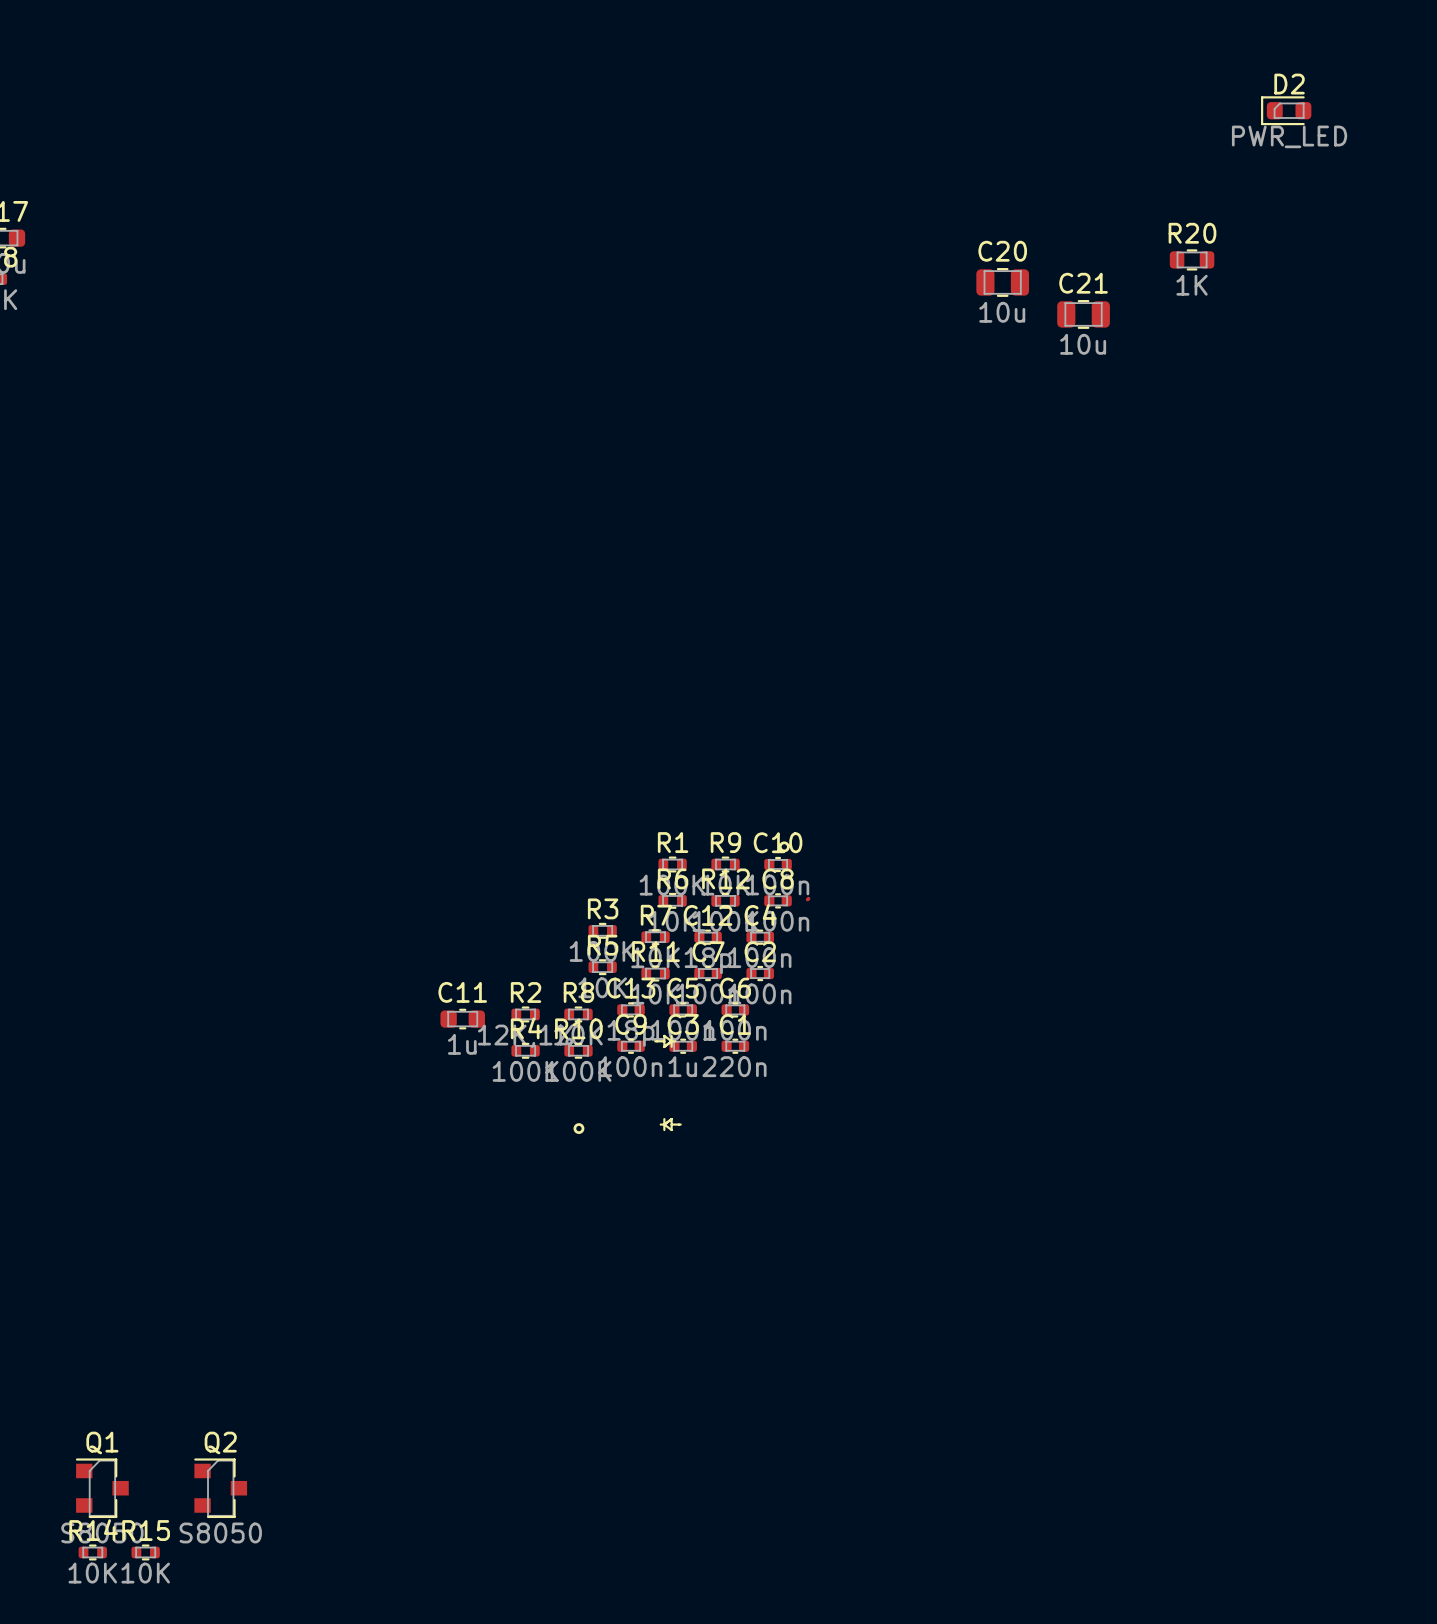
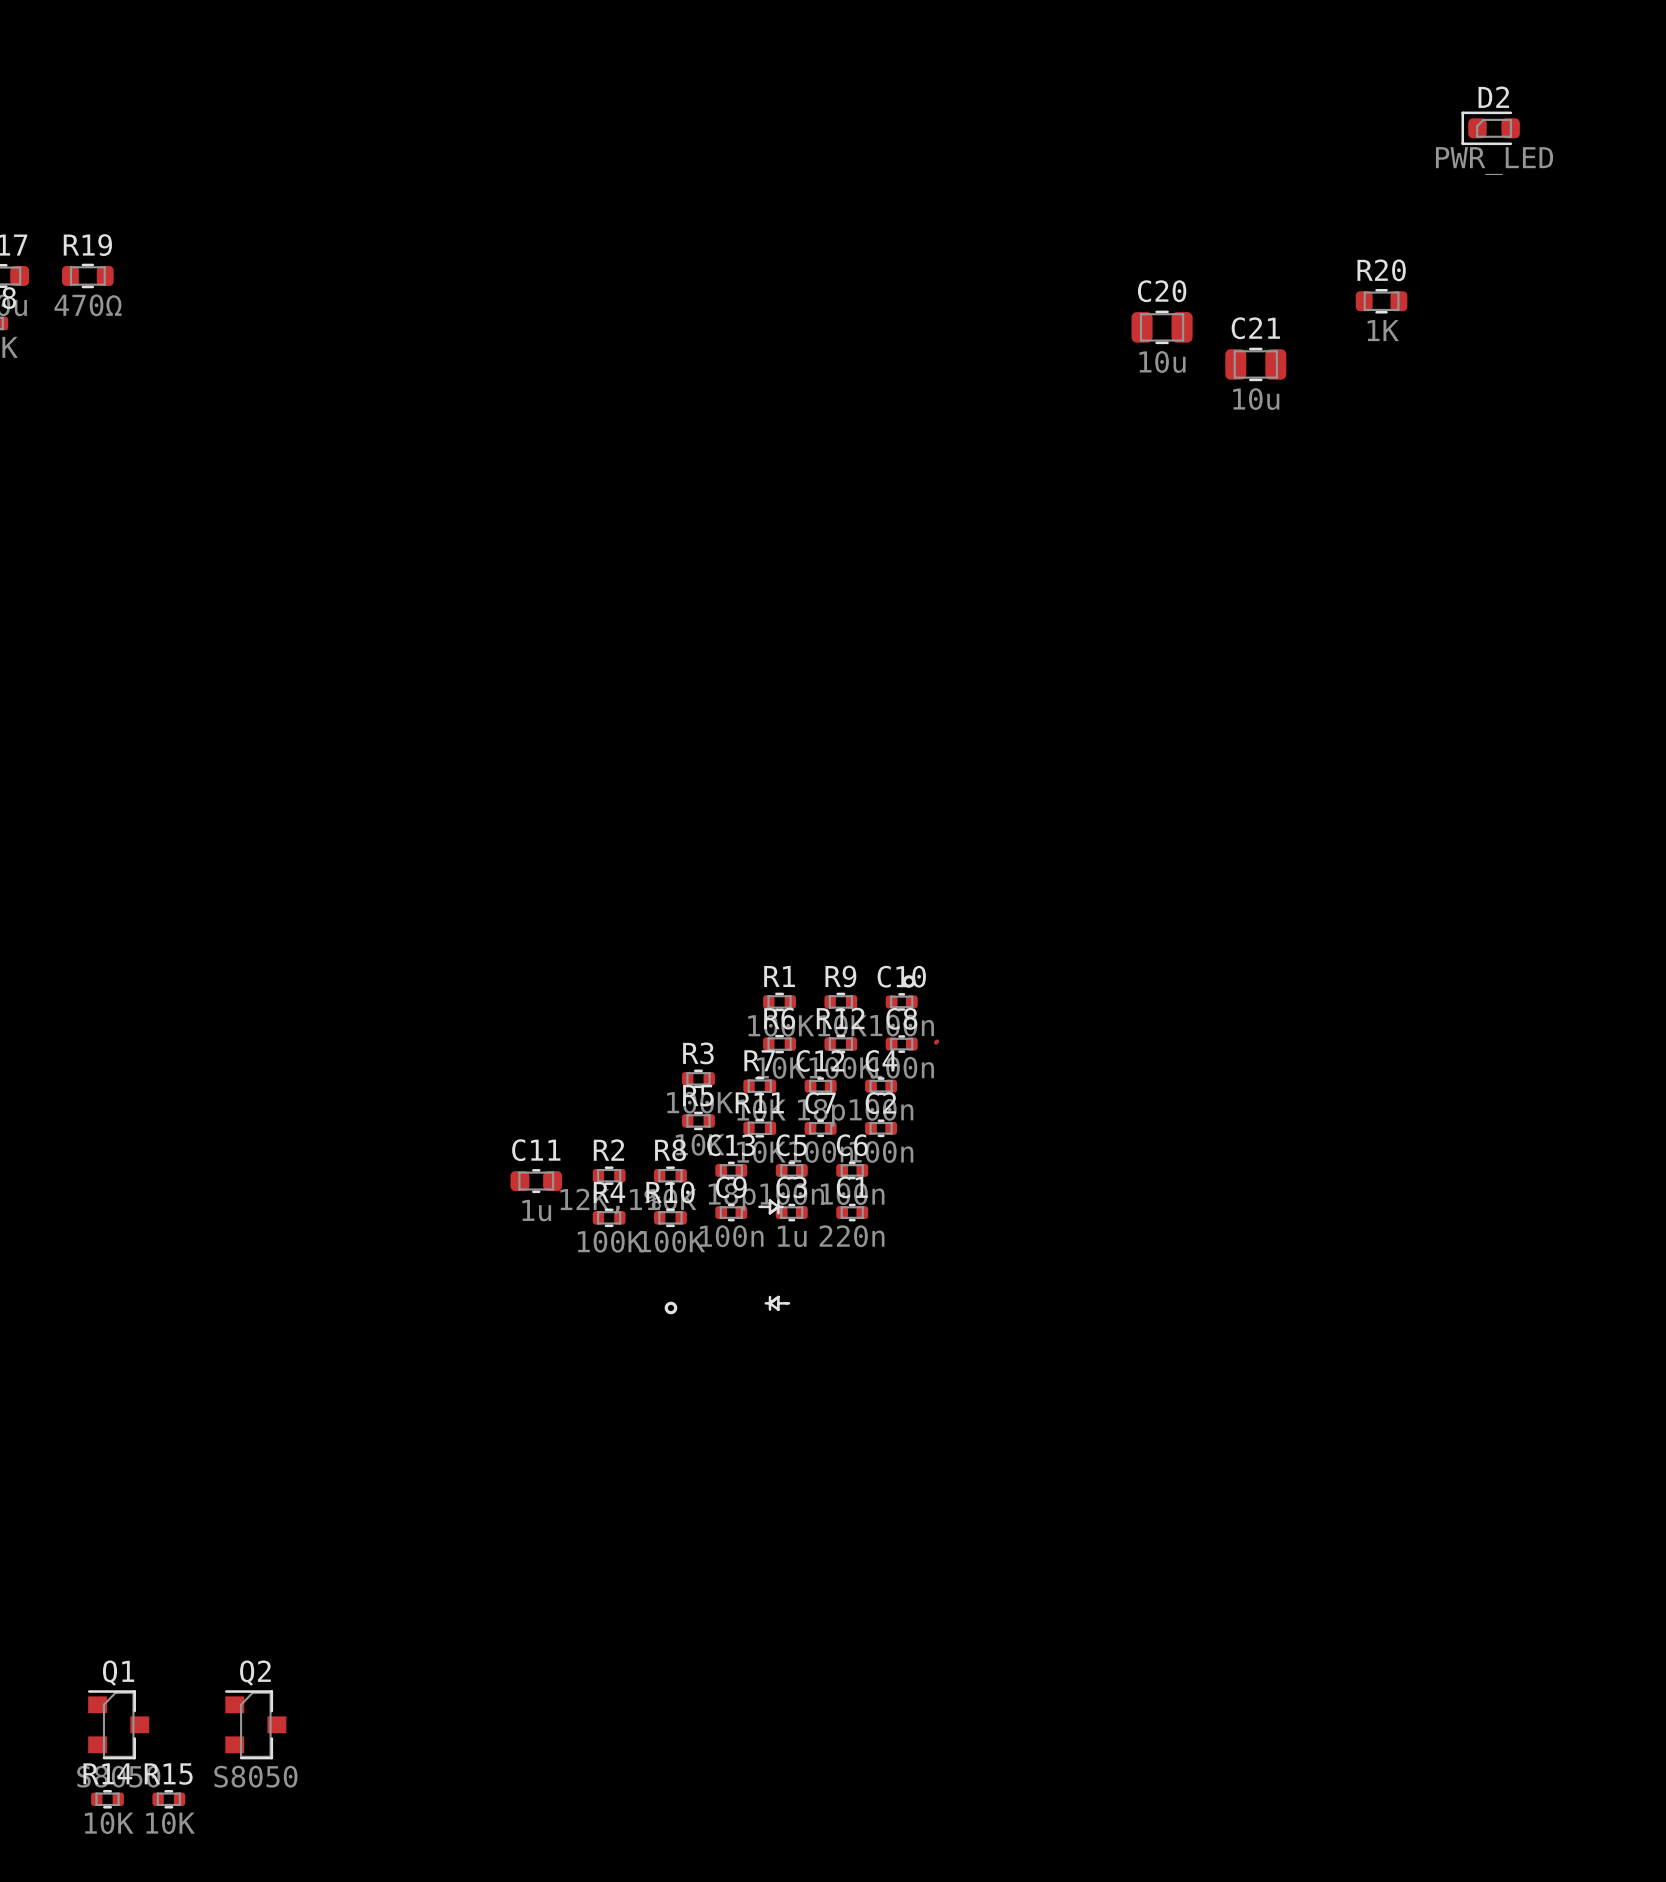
R19: none -> 470Ω (87, 275)

